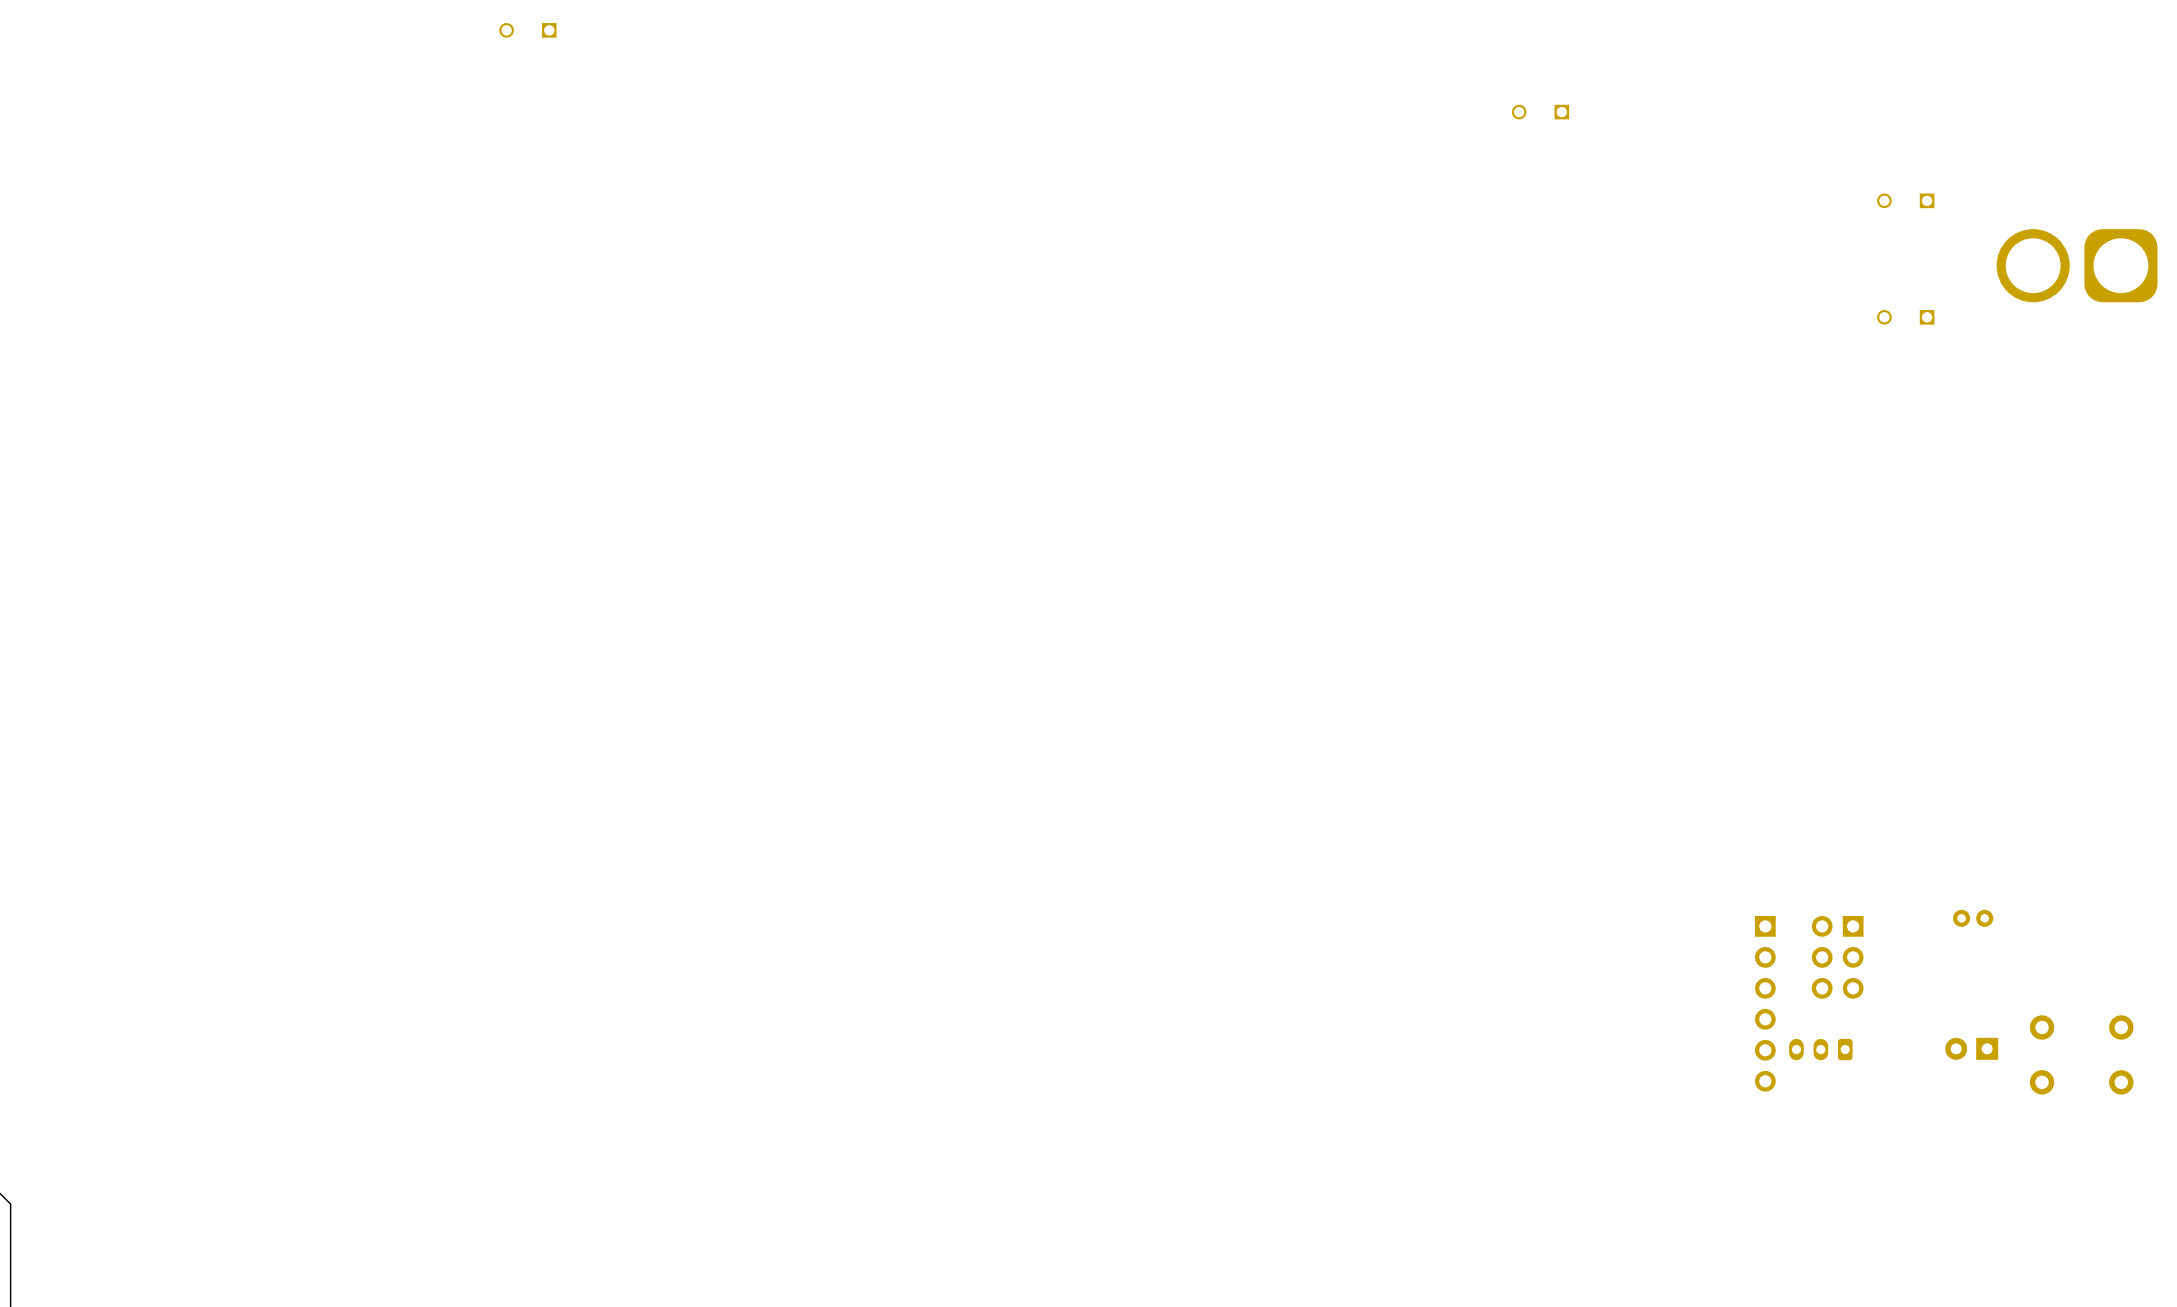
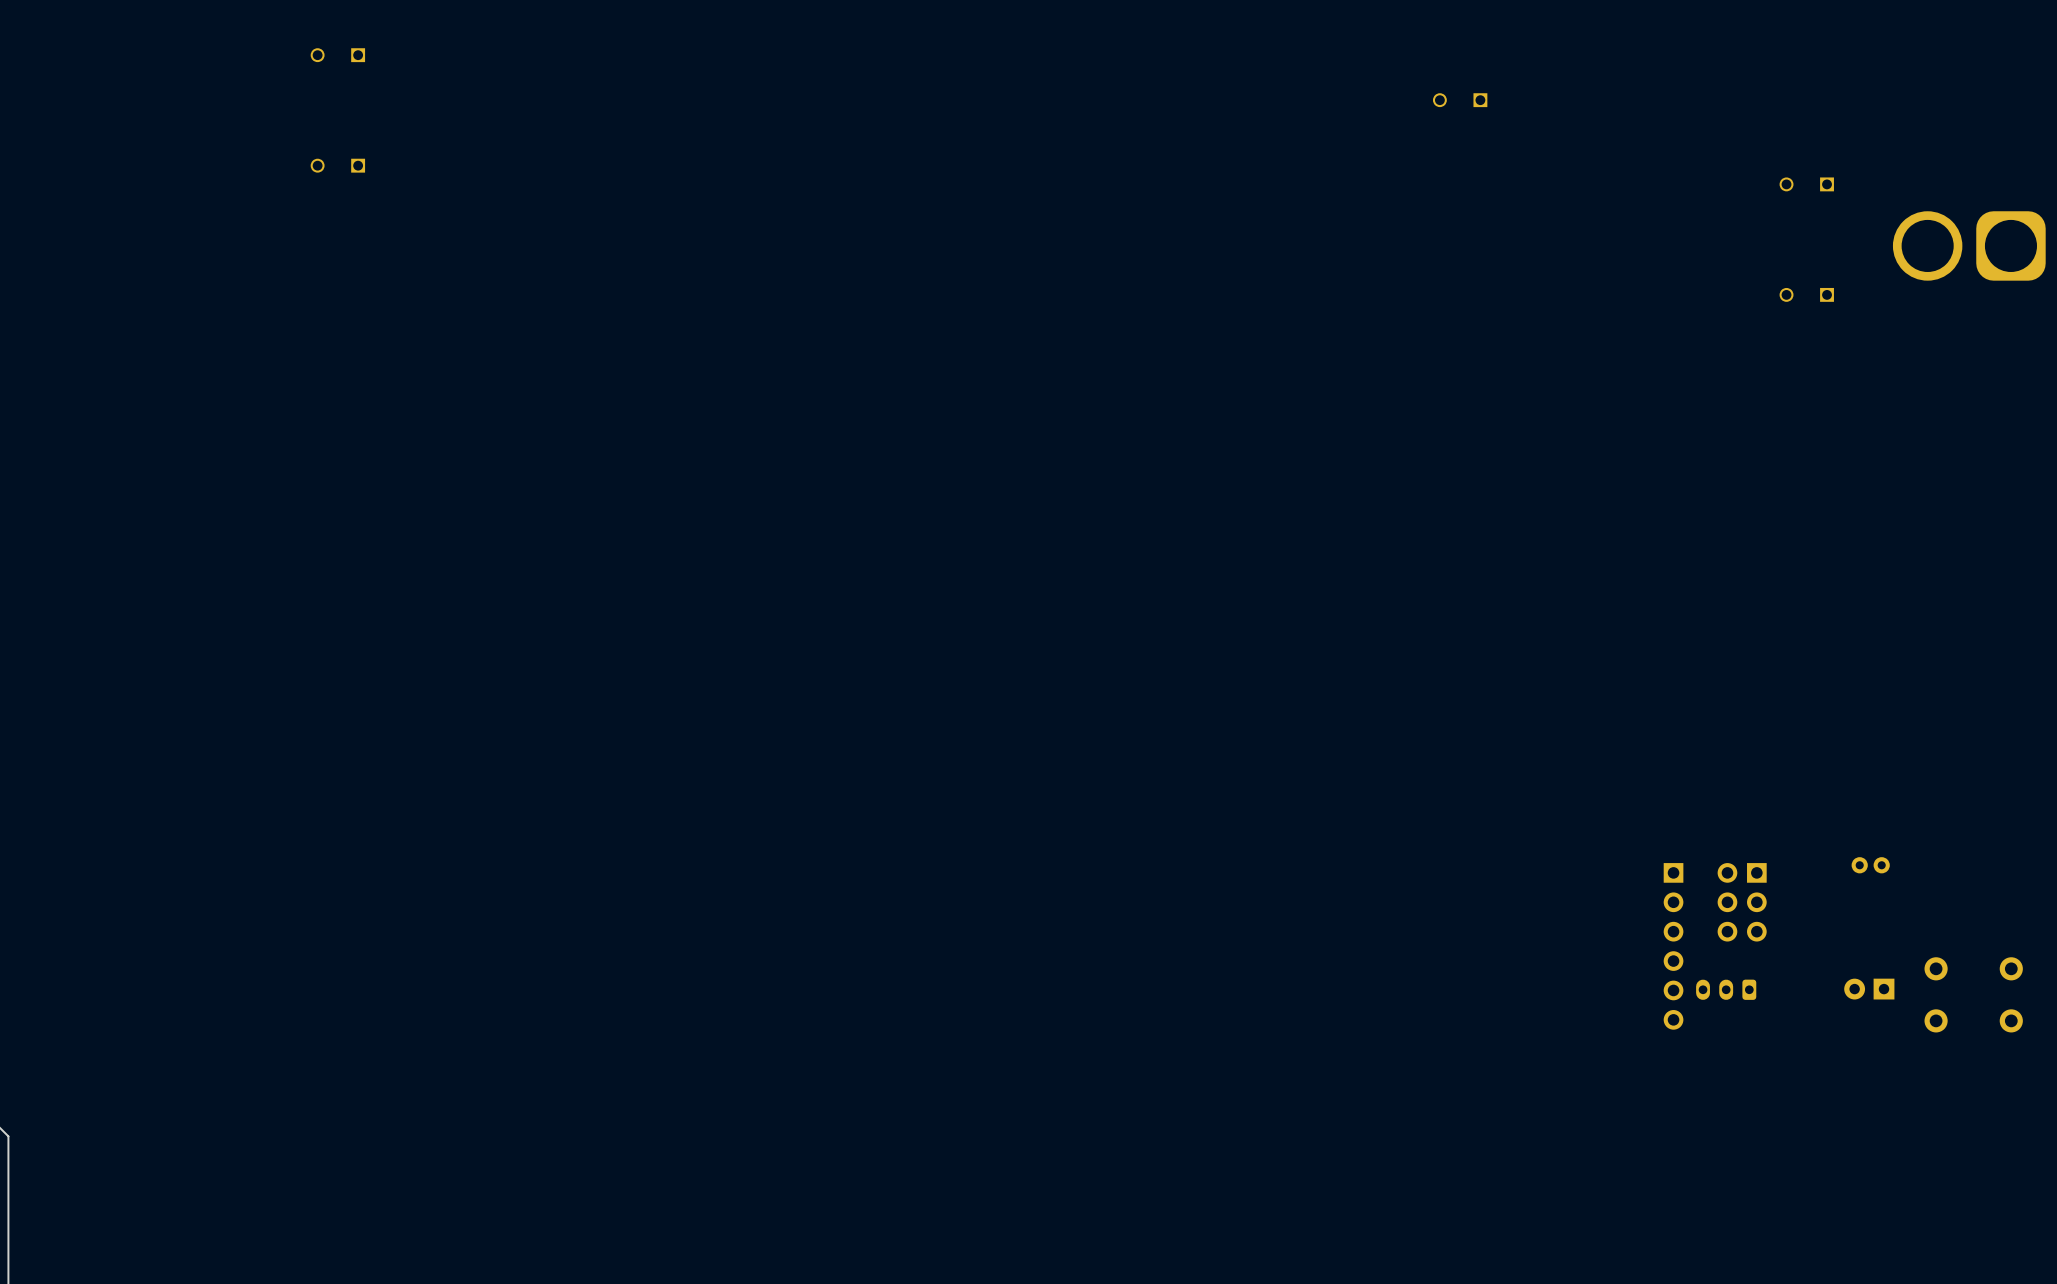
part: (527, 30) -> none
part: none -> (337, 55)
part: none -> (337, 165)

